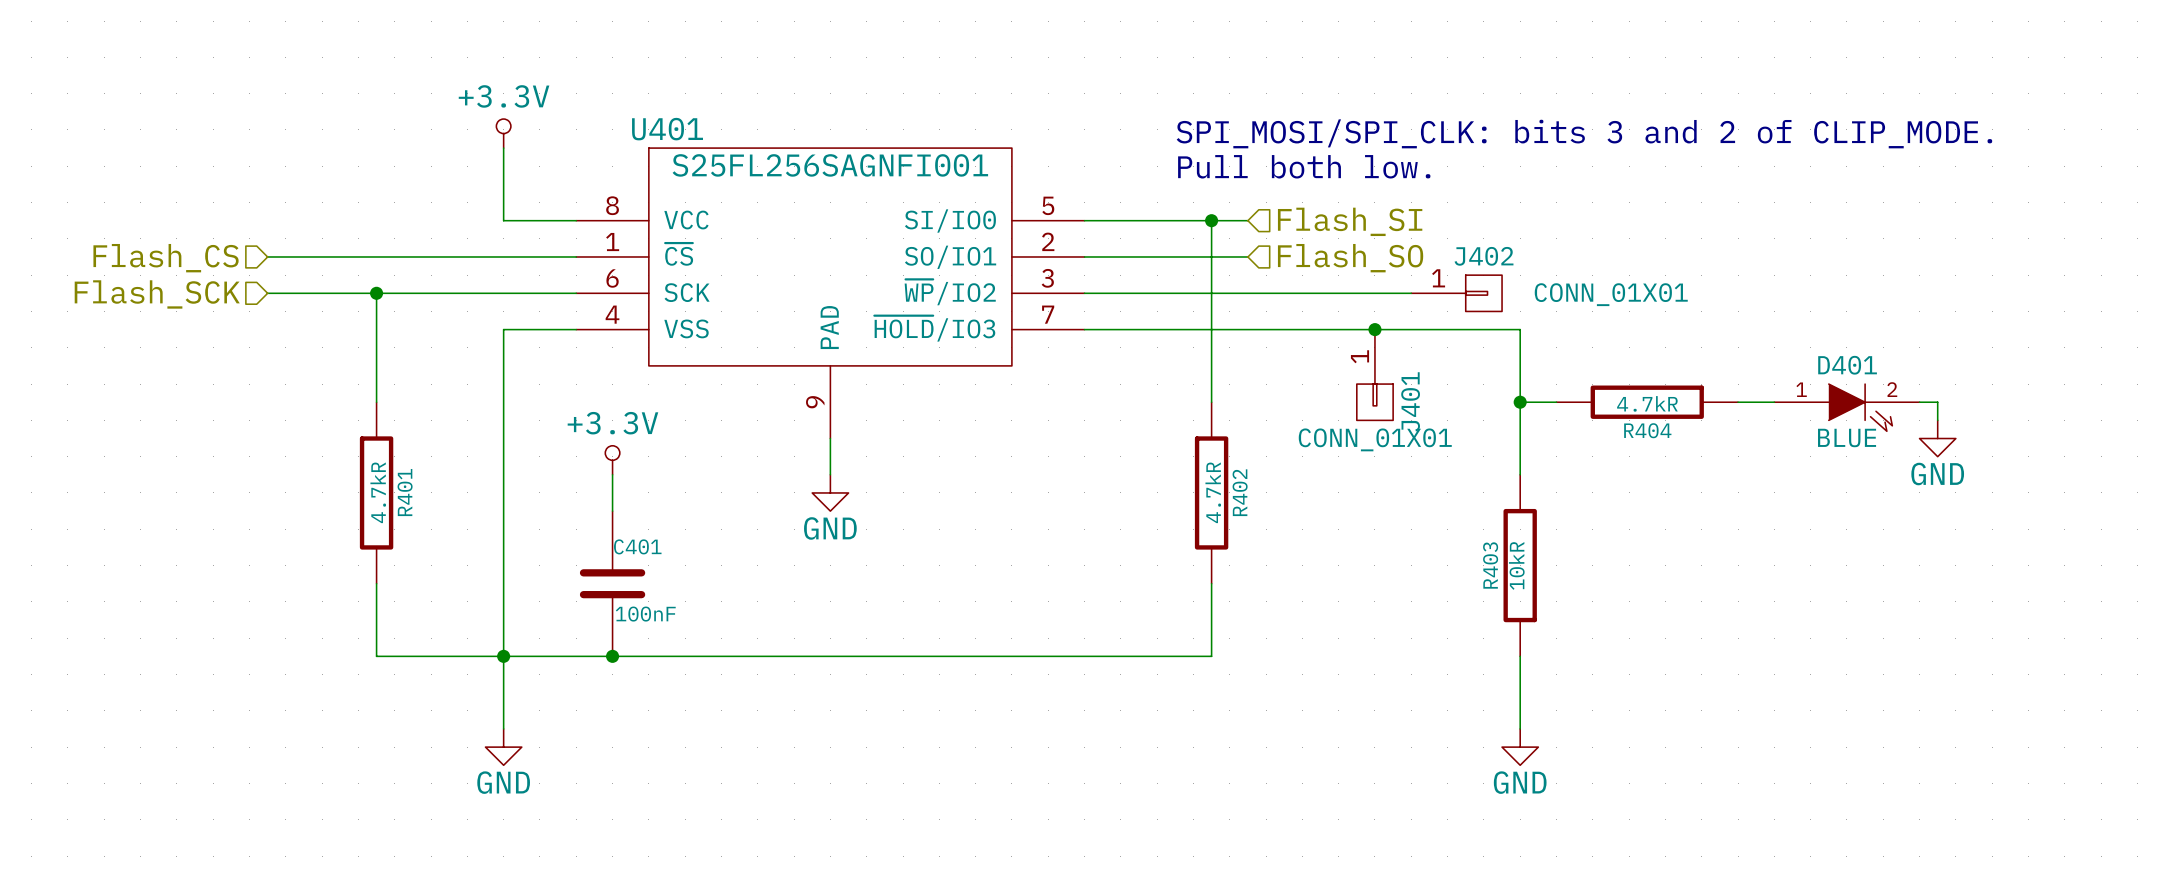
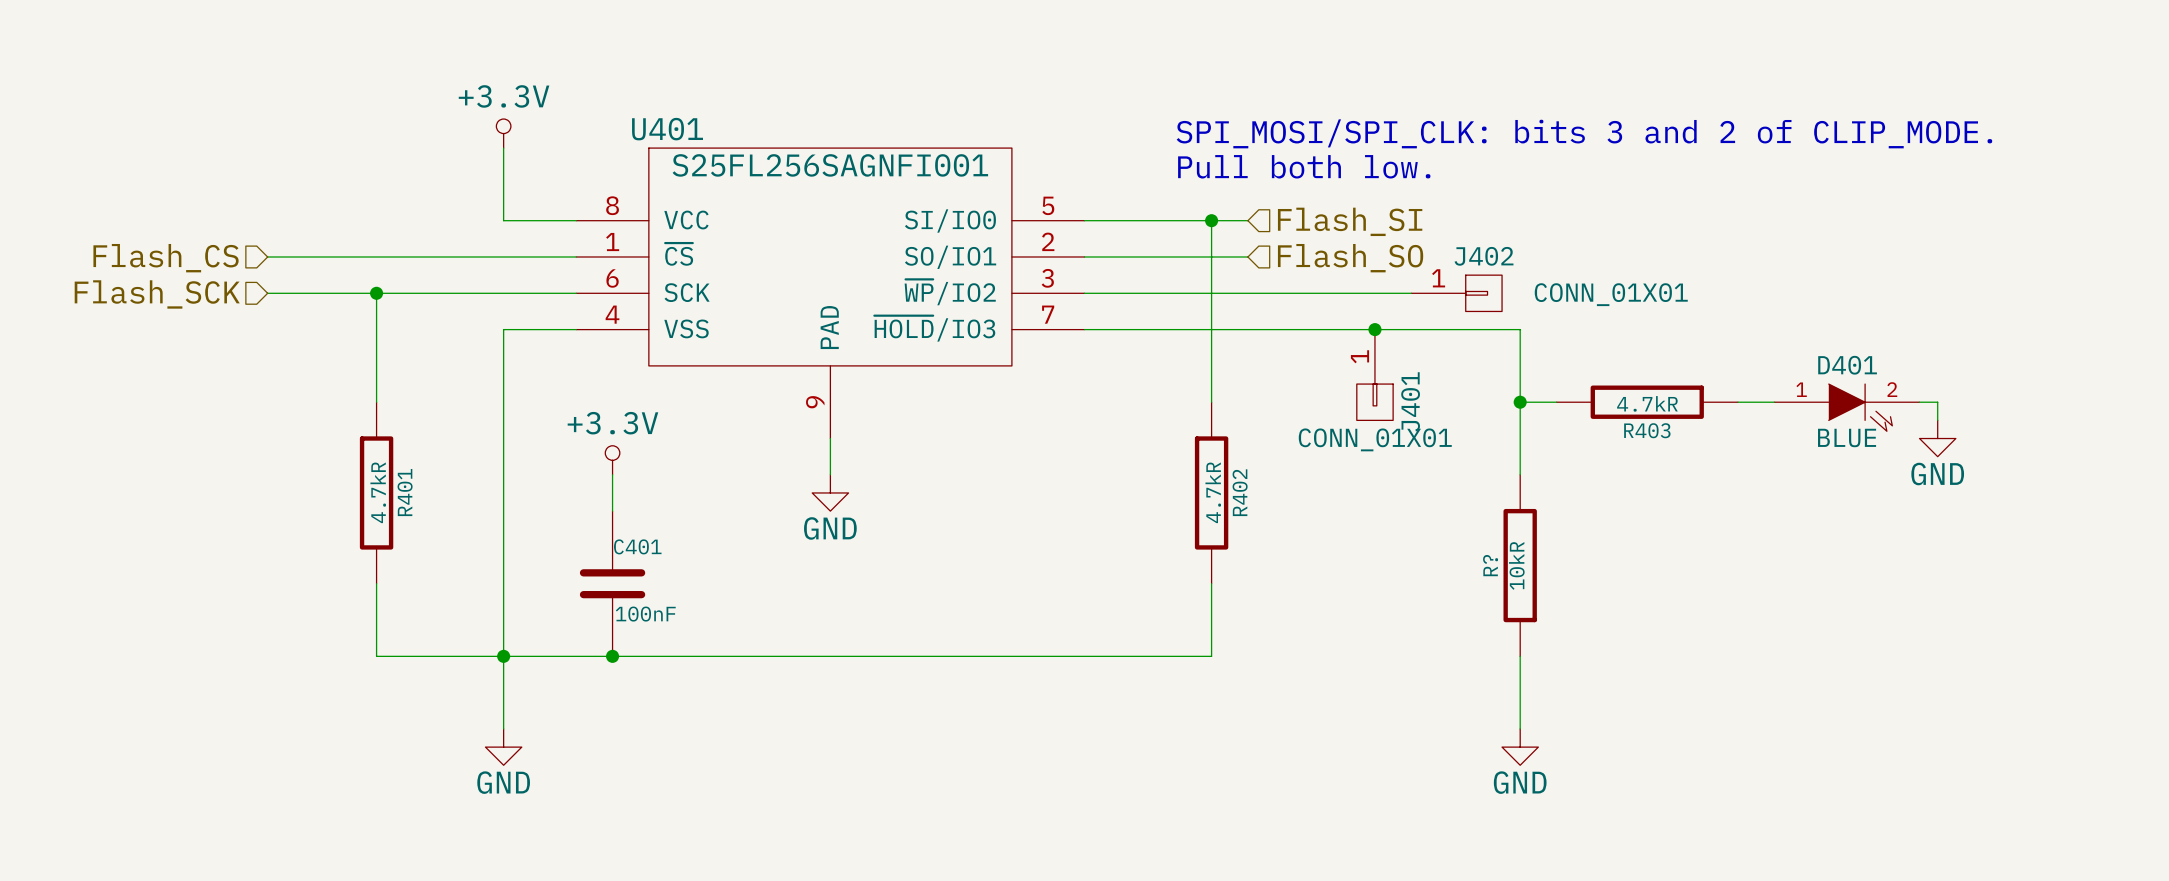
R404 name: R404 (1647, 430) -> R403 (1647, 430)
R403 name: R403 (1490, 565) -> R? (1490, 565)

